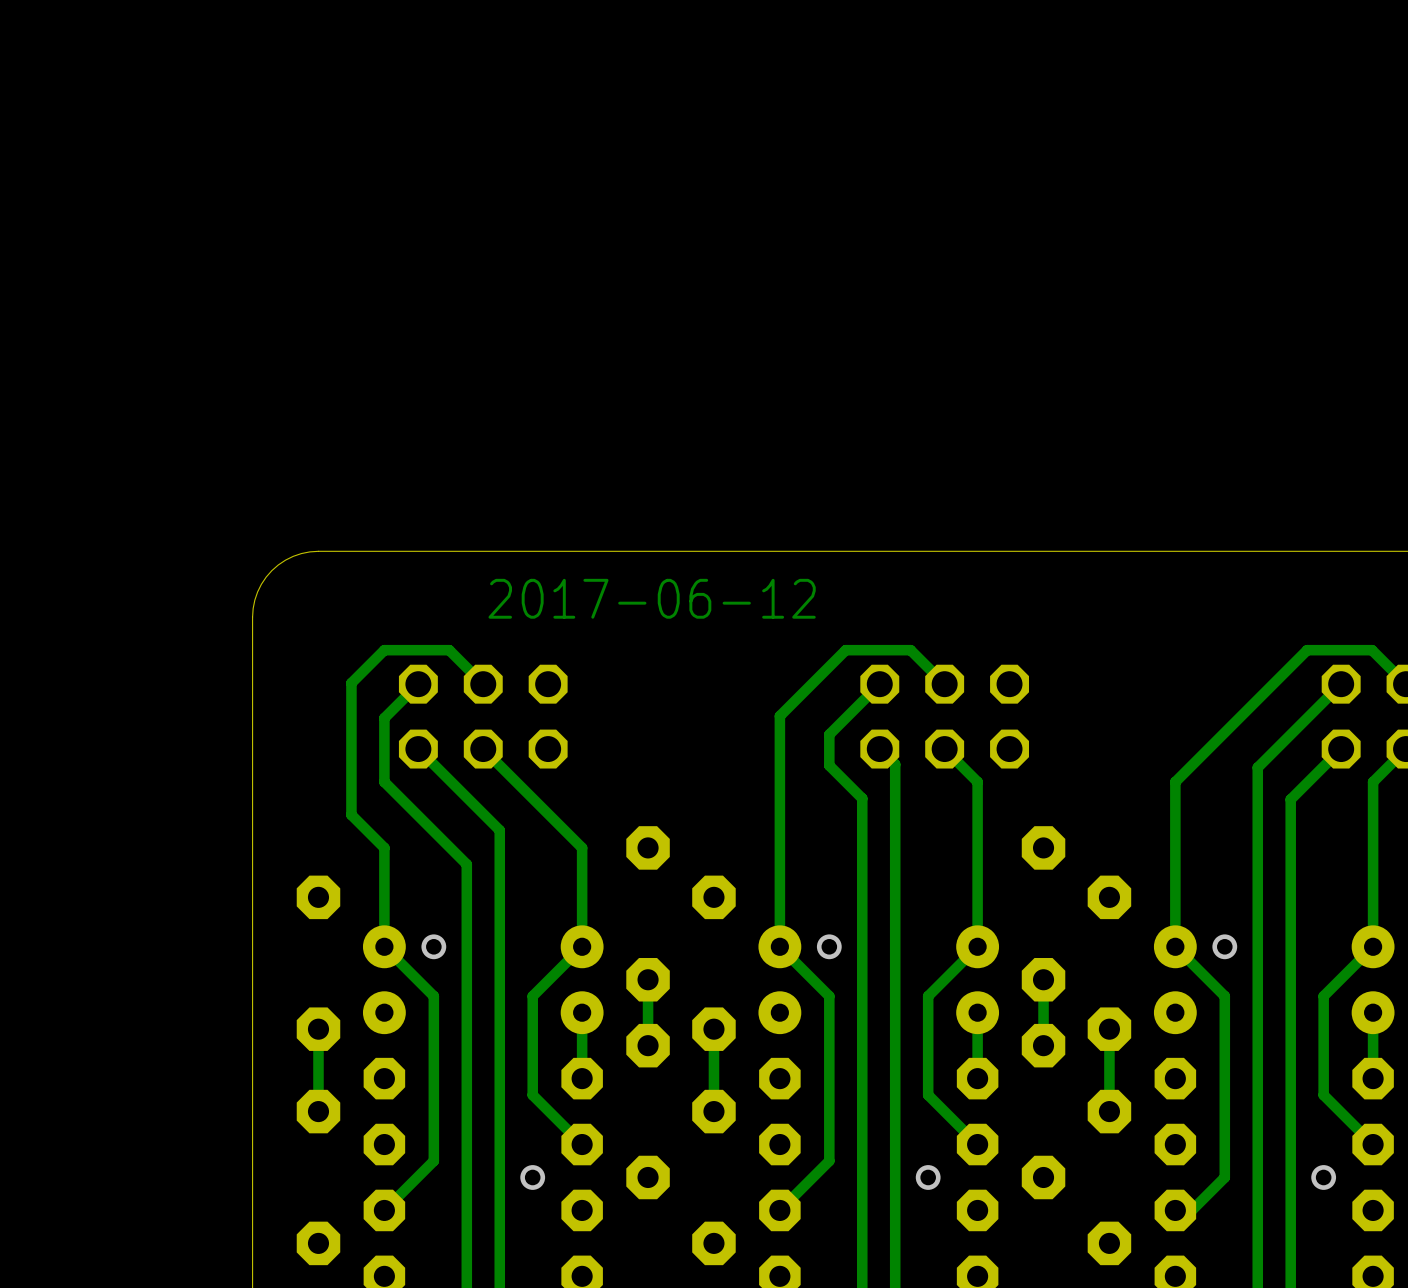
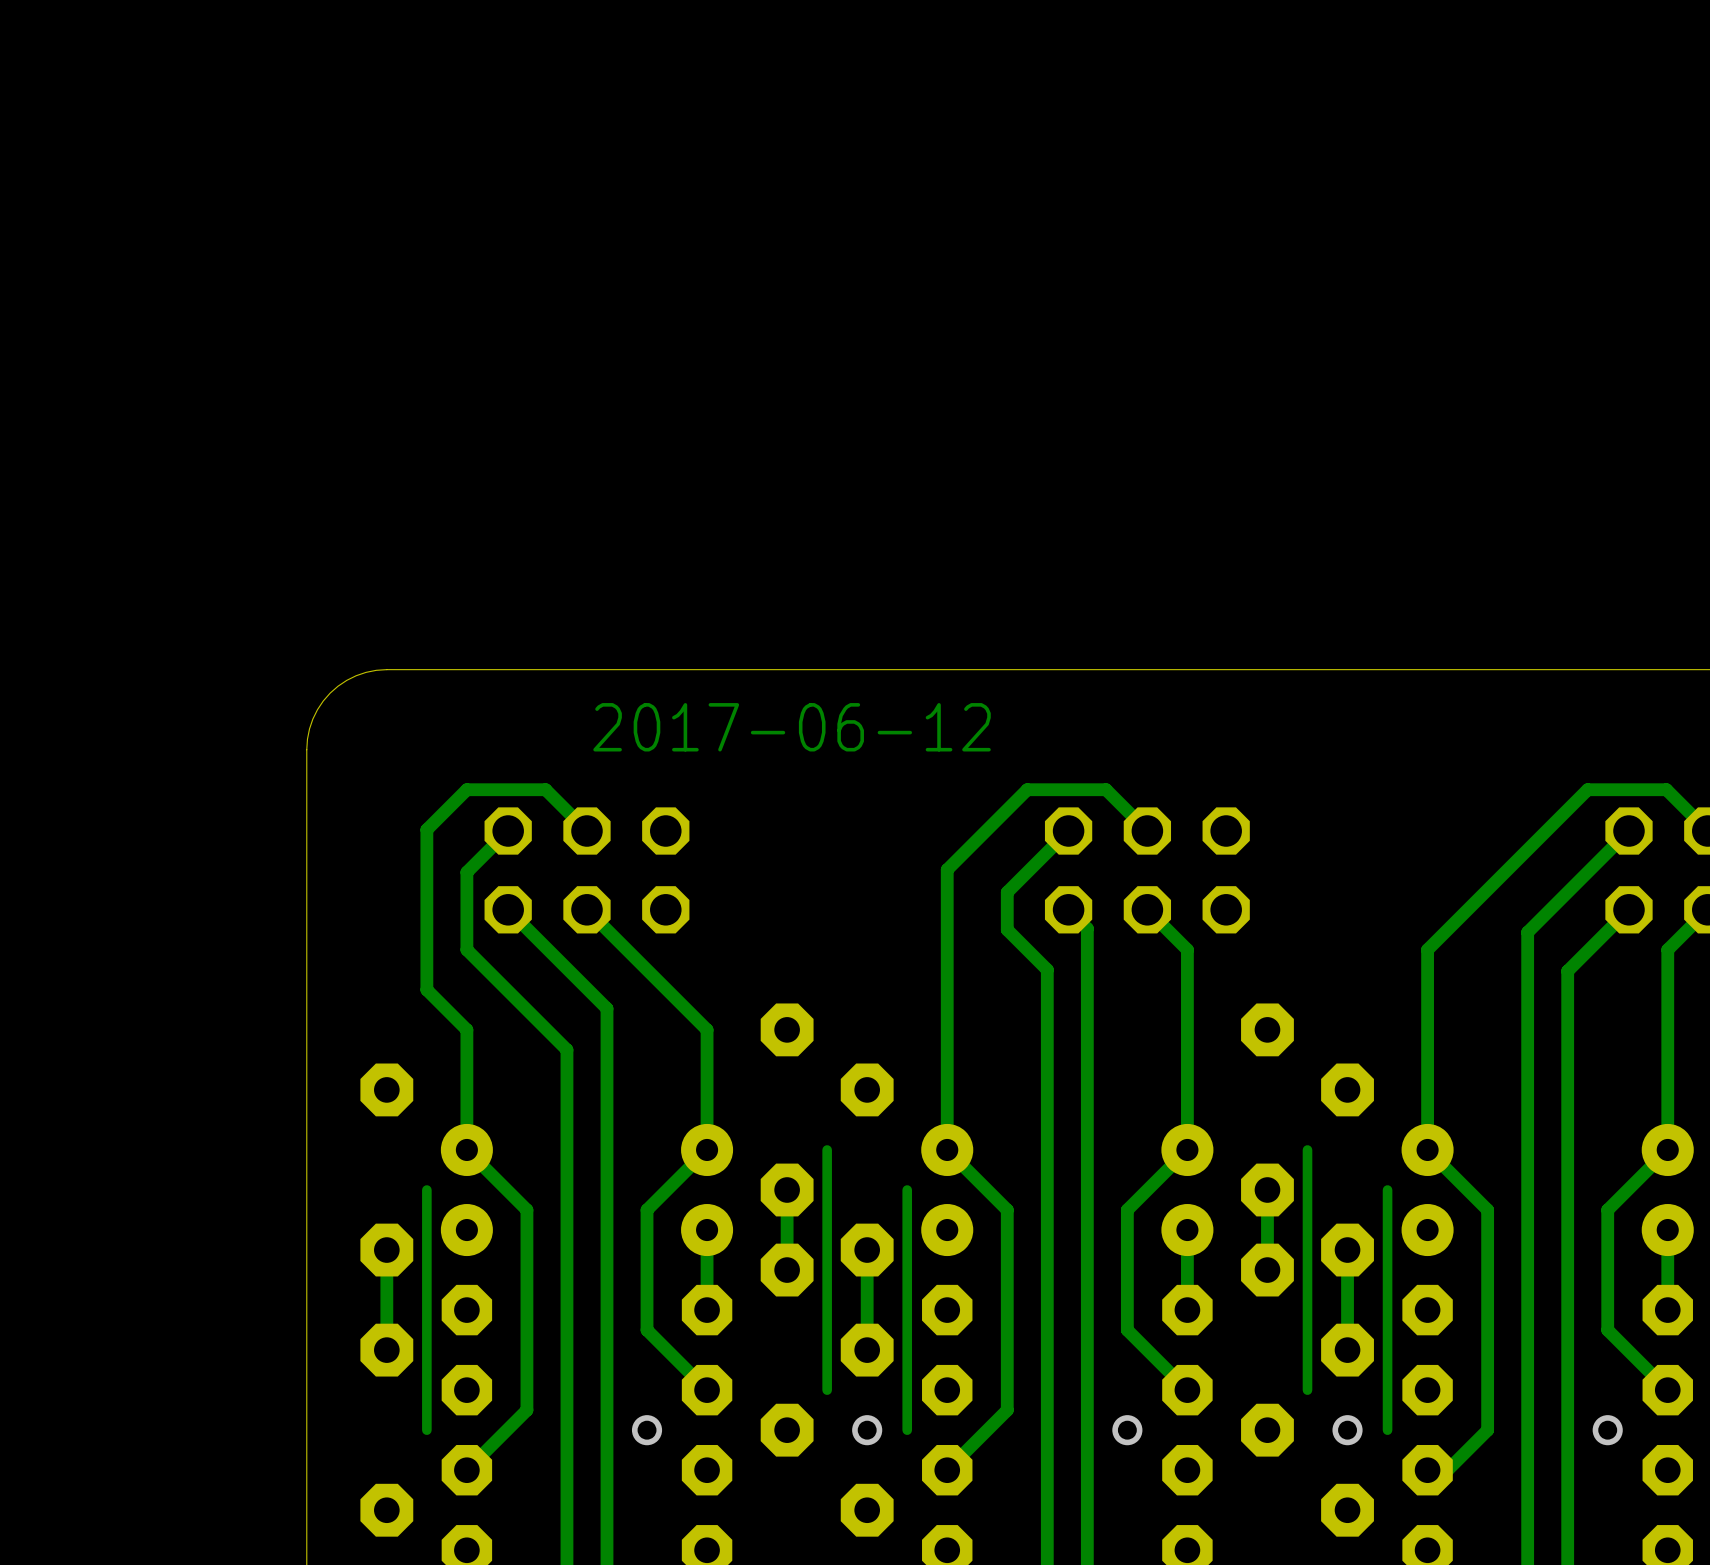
via: (433, 946) -> none
track: none -> (827, 1149) (827, 1390)
via: (829, 946) -> none
track: none -> (1307, 1149) (1307, 1390)
via: (1224, 946) -> none
track: none -> (426, 1190) (426, 1430)
track: none -> (907, 1190) (907, 1430)
track: none -> (1387, 1190) (1387, 1430)
via: none -> (867, 1430)
via: none -> (1347, 1430)

